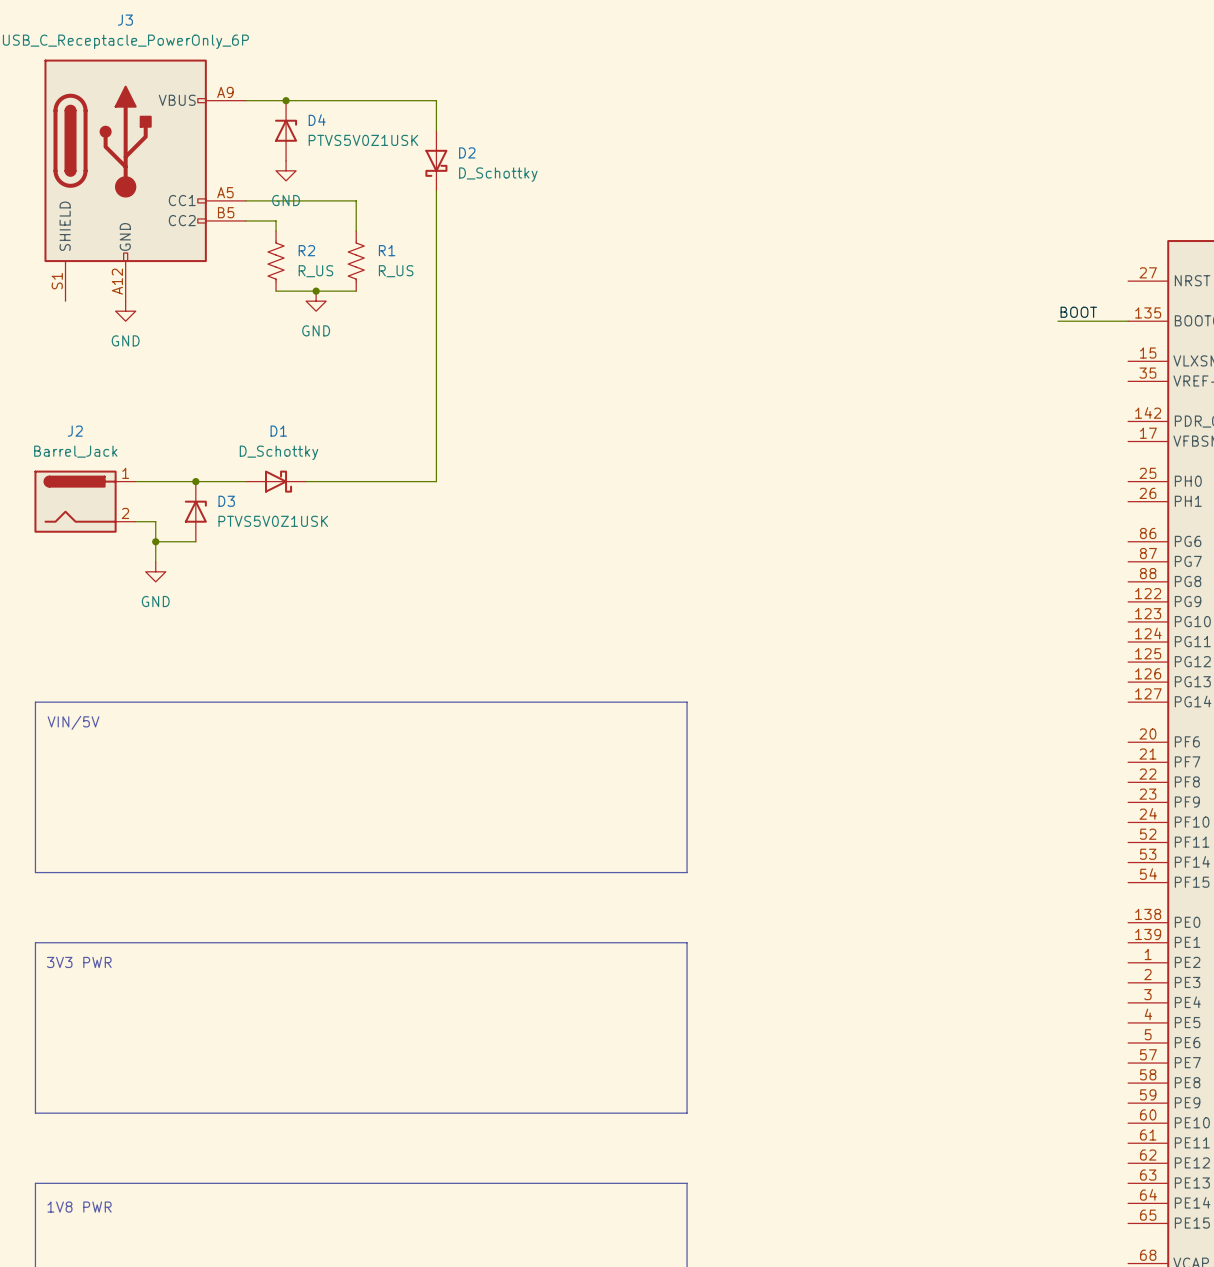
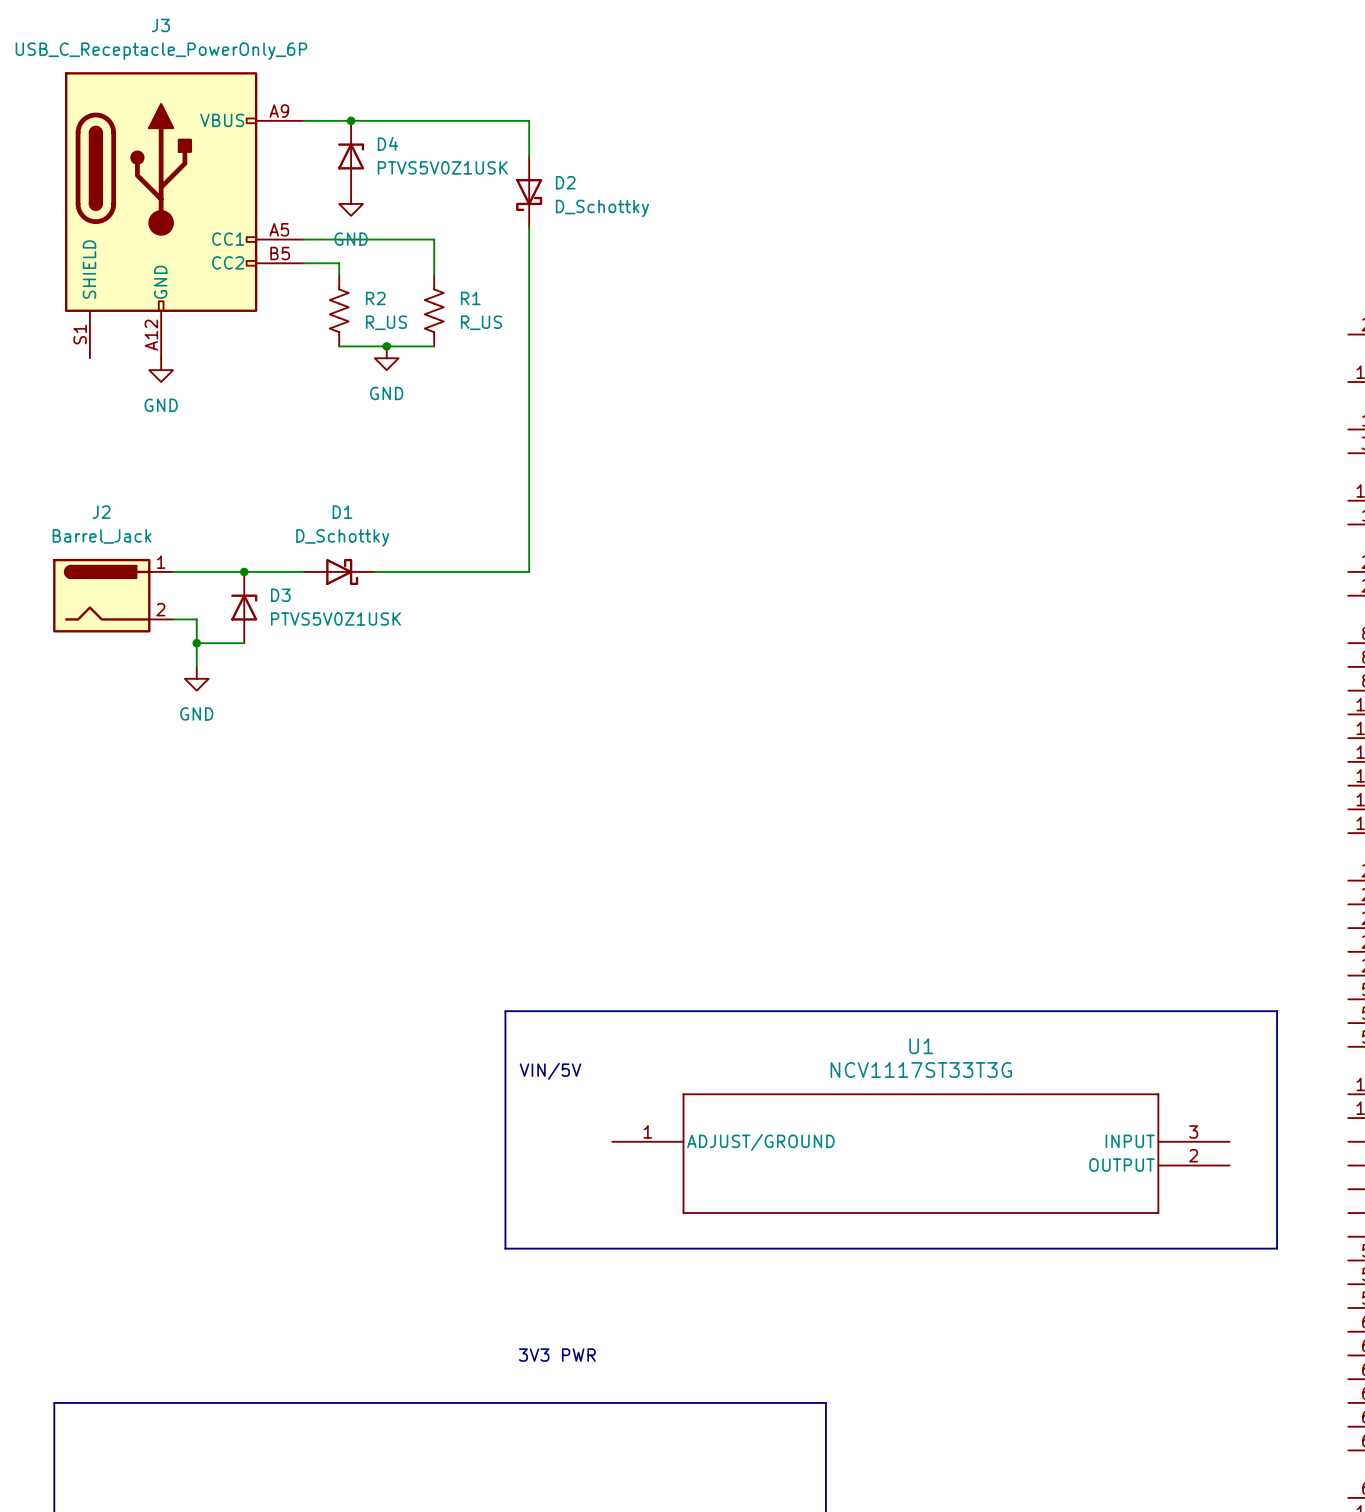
label: BOOT (1078, 312) -> none
wire: (1057, 321) (1128, 321) -> none
line: (35, 702) (35, 872) (687, 872) (687, 702) (35, 702) -> none
text: VIN/5V (73, 722) -> none
line: none -> (505, 1011) (505, 1248) (1277, 1248) (1277, 1011) (505, 1011)
text: none -> VIN/5V (550, 1071)
line: (35, 942) (35, 1113) (687, 1113) (687, 942) (35, 942) -> none
text: 3V3 PWR (79, 962) -> none
U1: none -> NCV1117ST33T3G (920, 1153)
text: none -> 3V3 PWR (557, 1355)
text: 1V8 PWR (79, 1207) -> none

